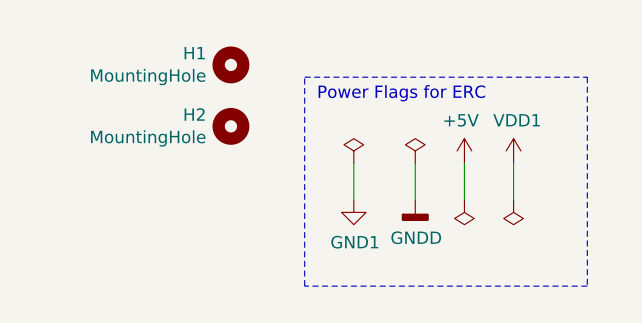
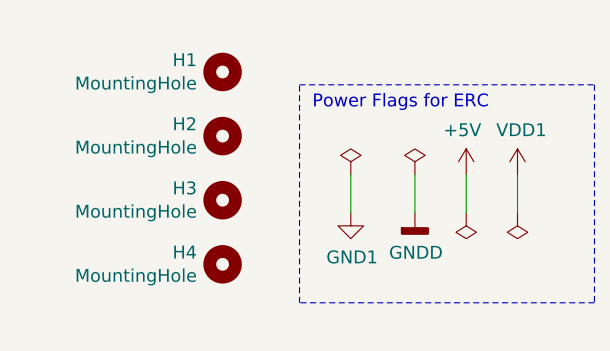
H3: none -> MountingHole (222, 200)
H4: none -> MountingHole (222, 264)

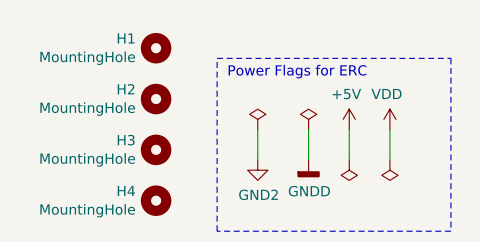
power symbol: VDD1 (517, 161) -> VDD (389, 119)
power symbol: GND1 (350, 225) -> GND2 (257, 170)

